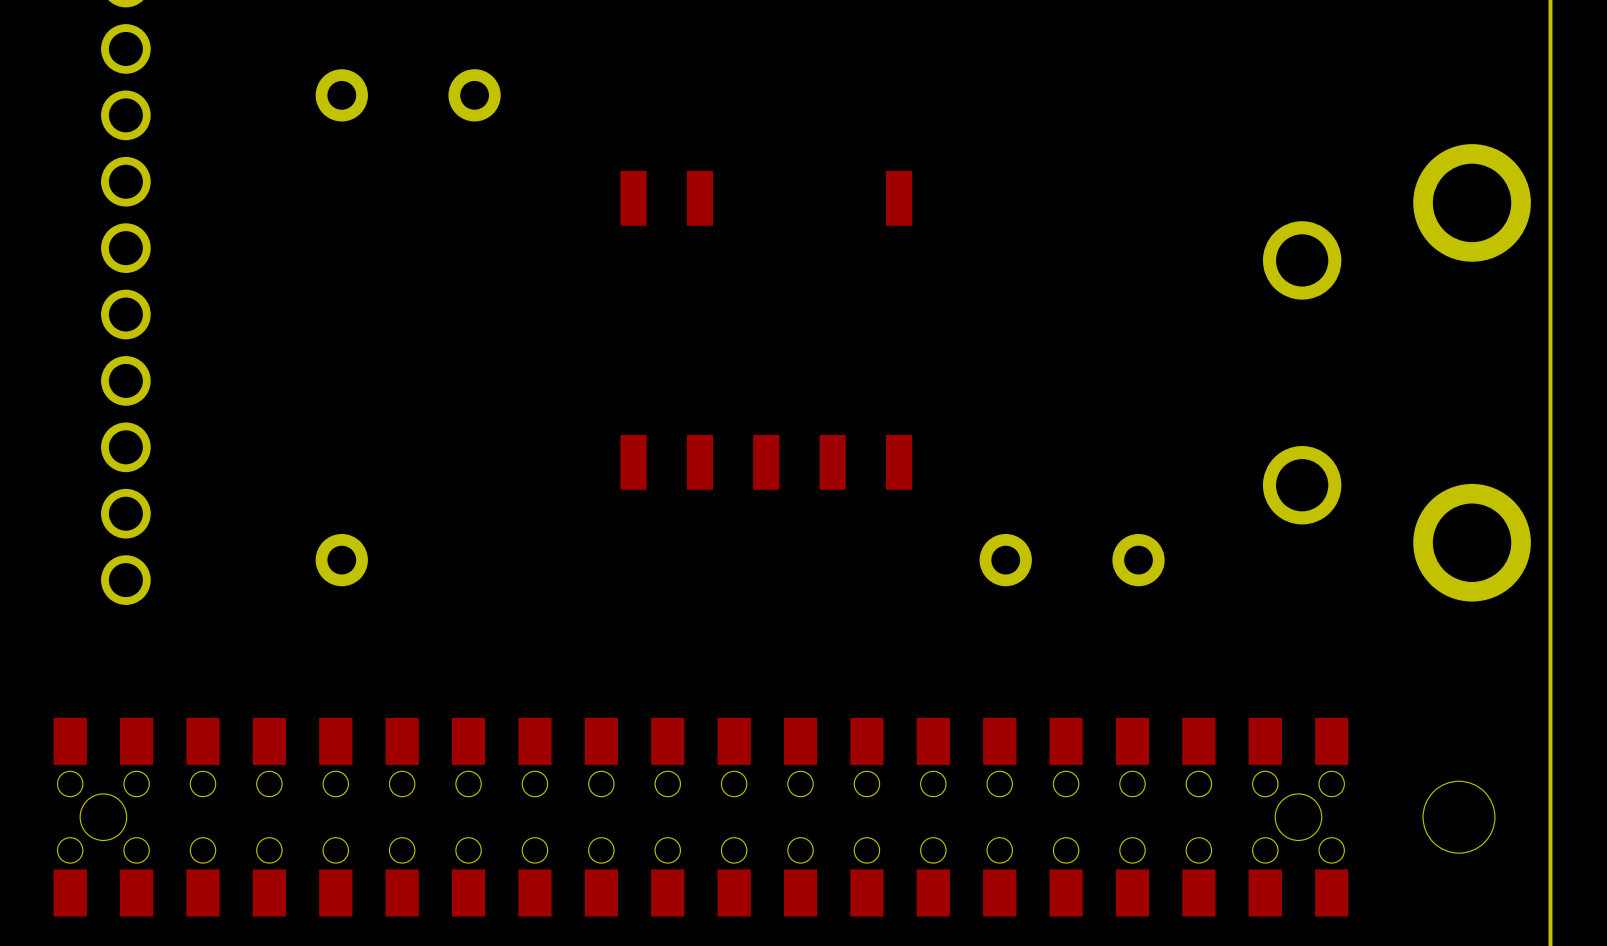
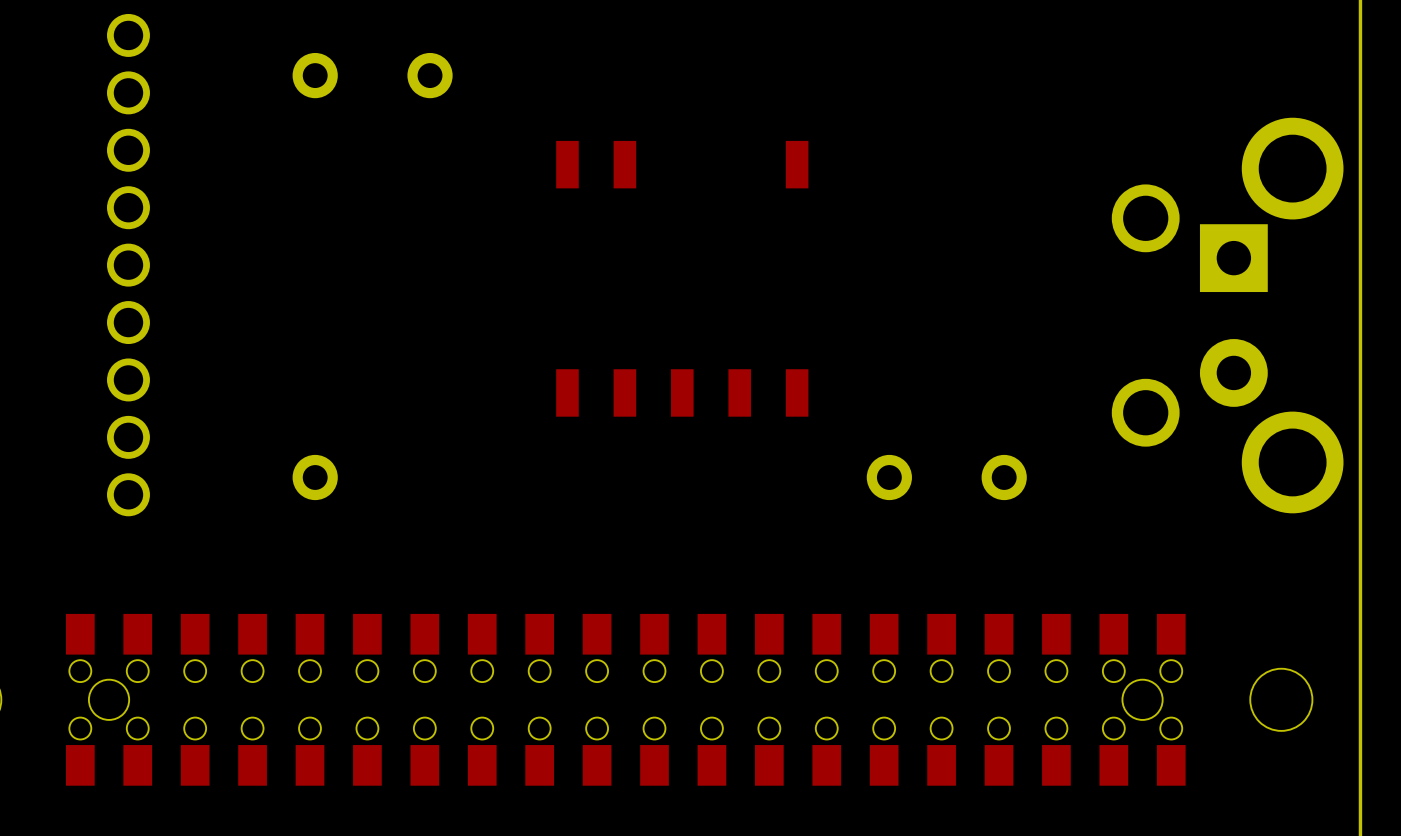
part: none -> (1233, 315)

